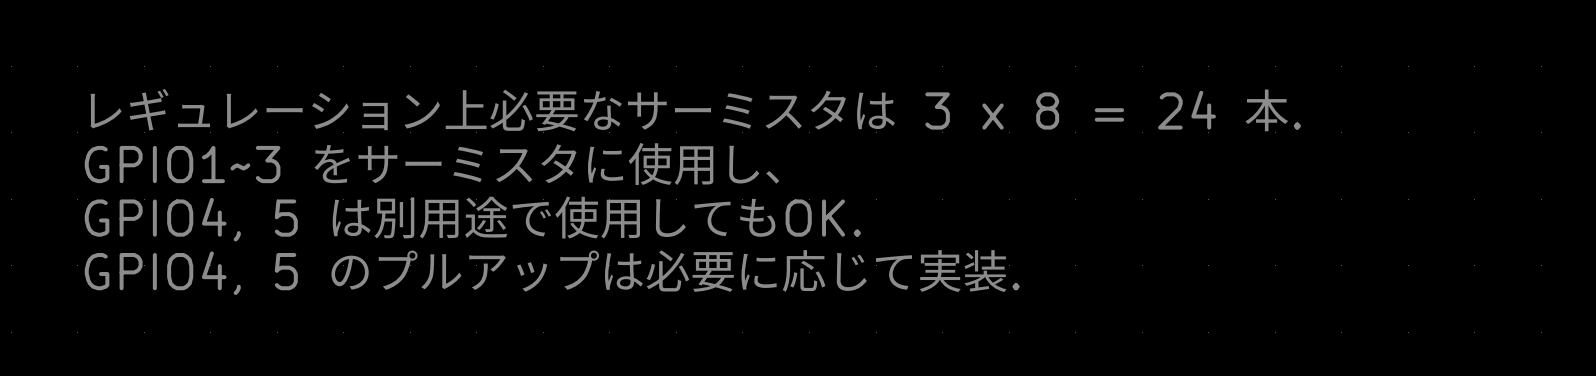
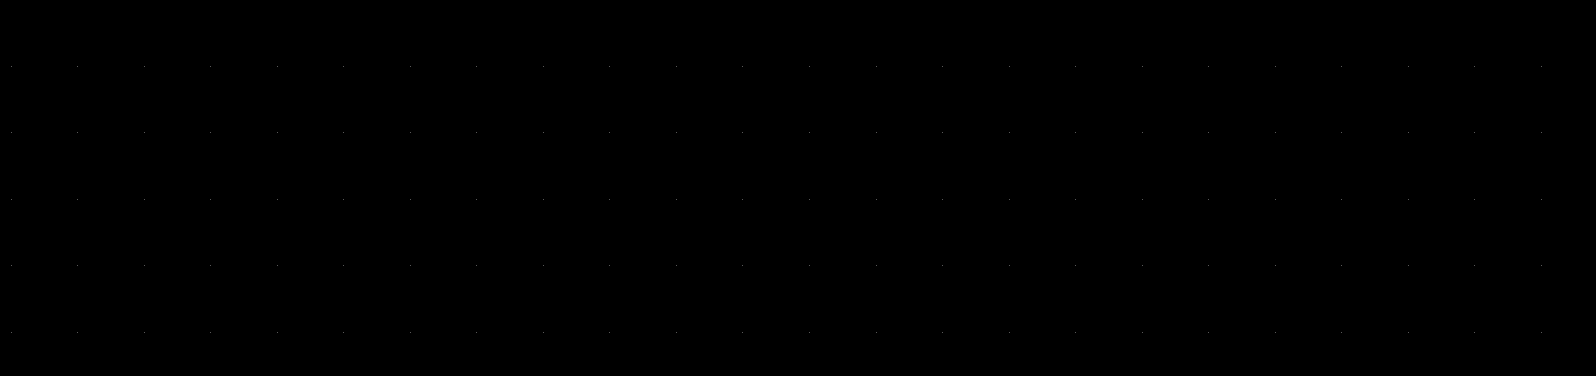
text: レギュレーション上必要なサーミスタは 3 x 8 = 24 本. (694, 110) -> none
text: GPIO1~3 をサーミスタに使用し、 (433, 163) -> none
text: GPIO4, 5 は別用途で使用してもOK. (472, 217) -> none
text: GPIO4, 5 のプルアップは必要に応じて実装. (552, 271) -> none

